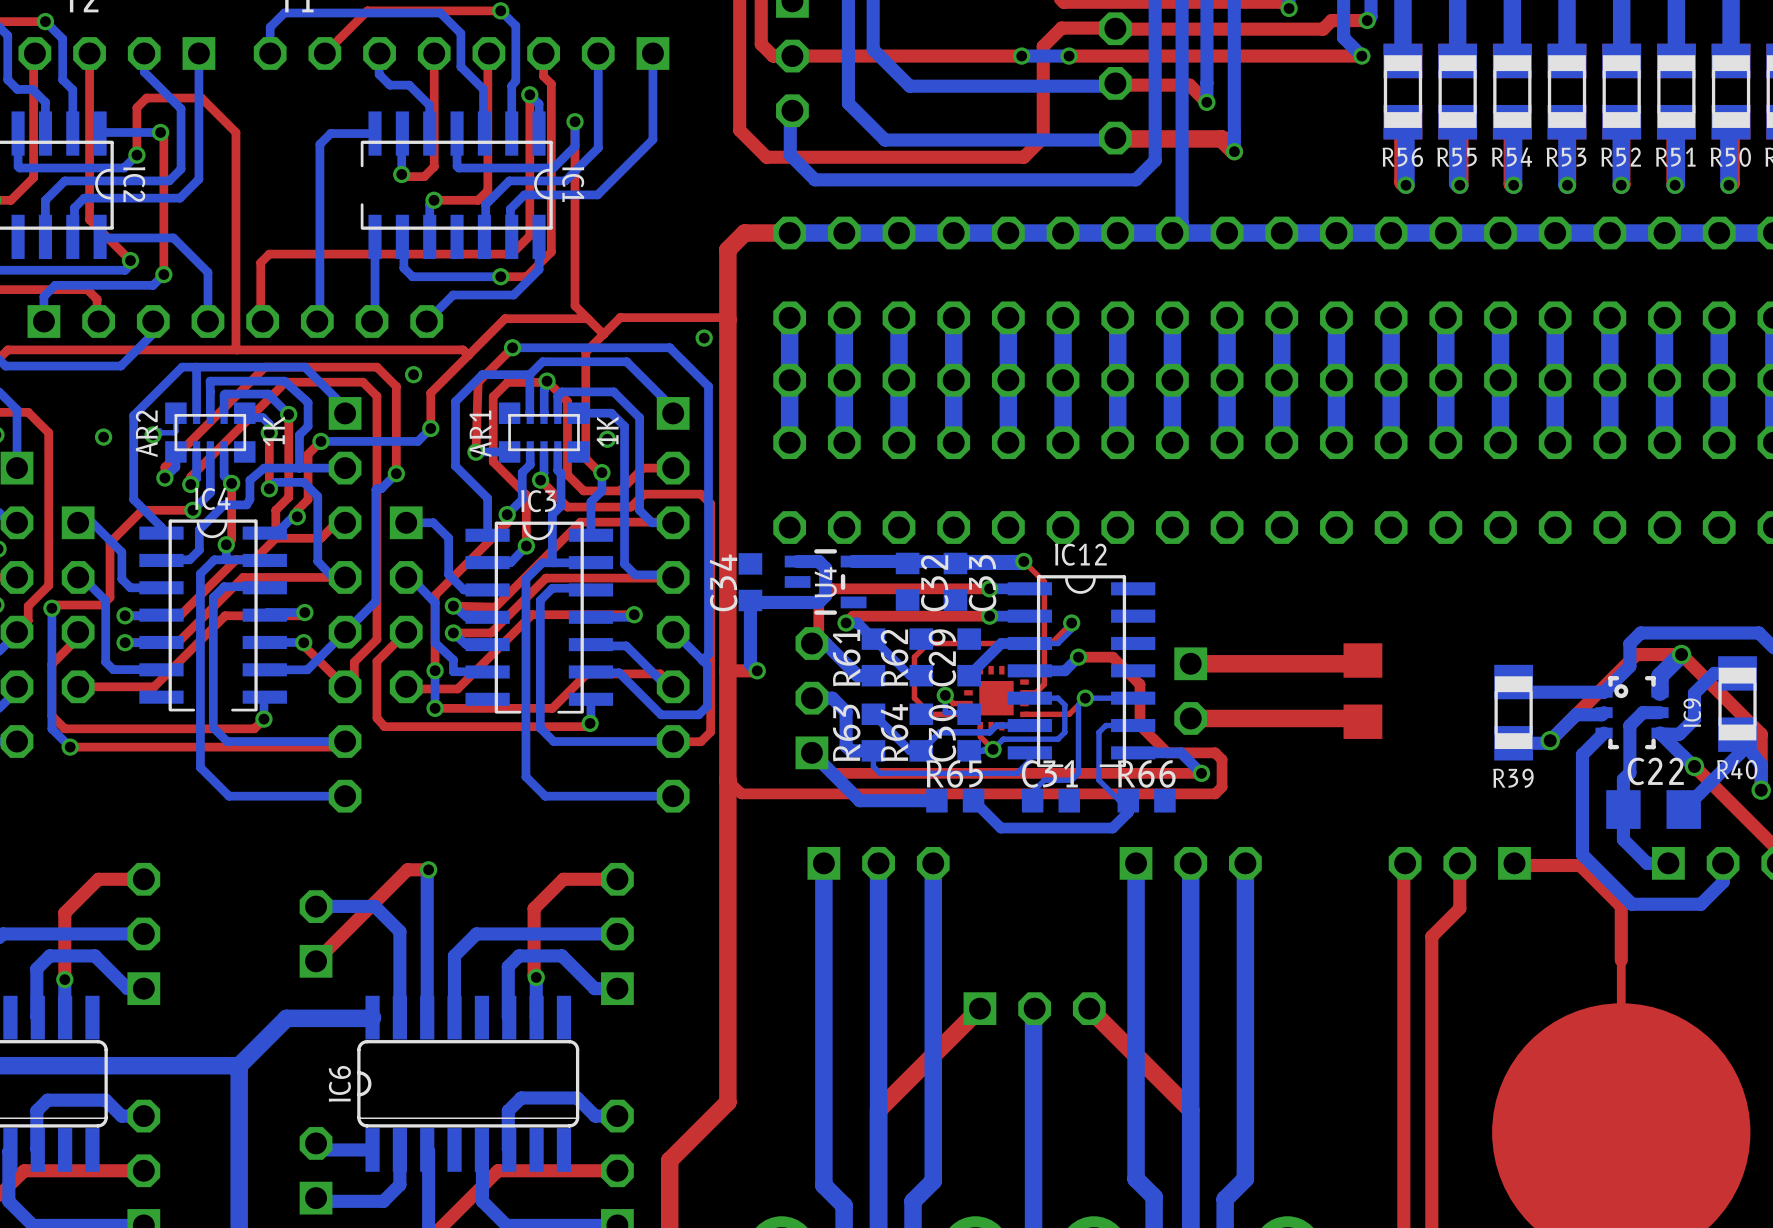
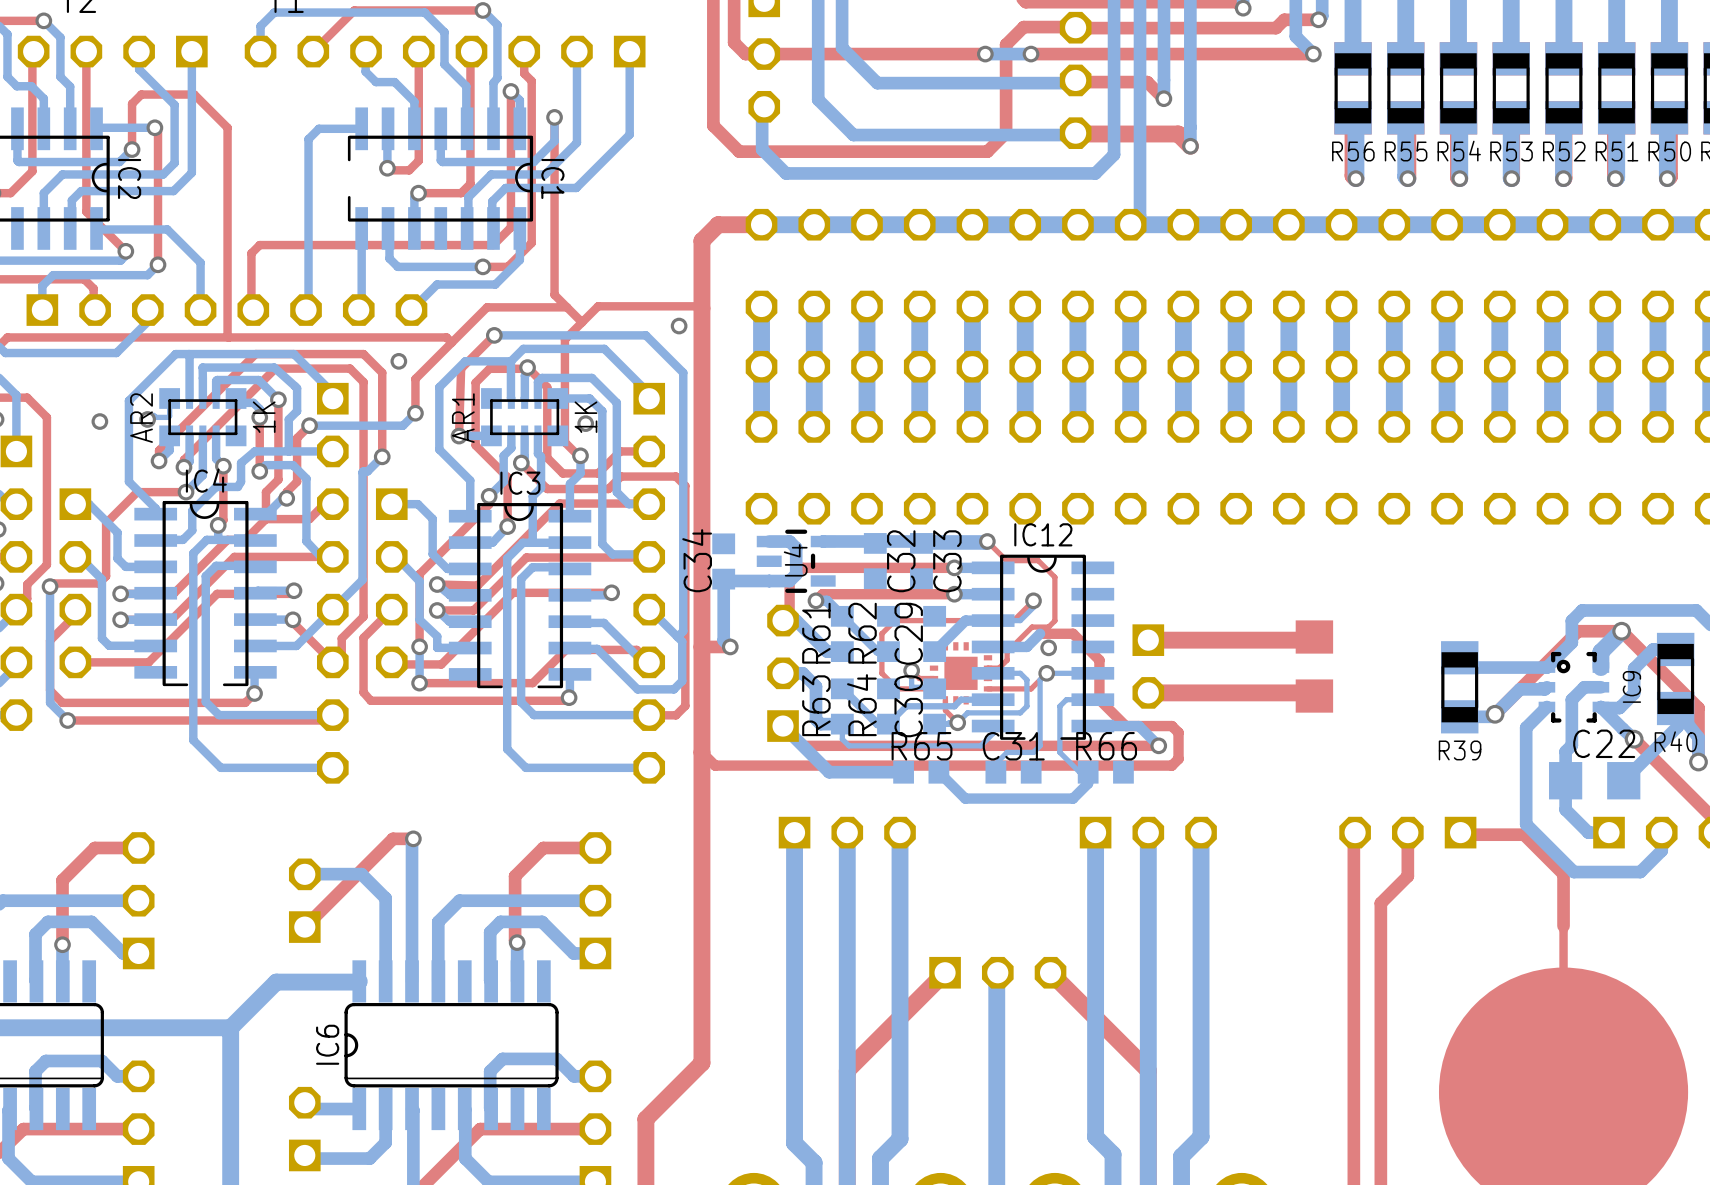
top track: (1043, 581) (1044, 676) -> (1006, 560) (1038, 560) (1054, 577) (1054, 620) (1048, 627) (1032, 627) (1007, 651)
via position: (1078, 657) -> (1048, 647)

